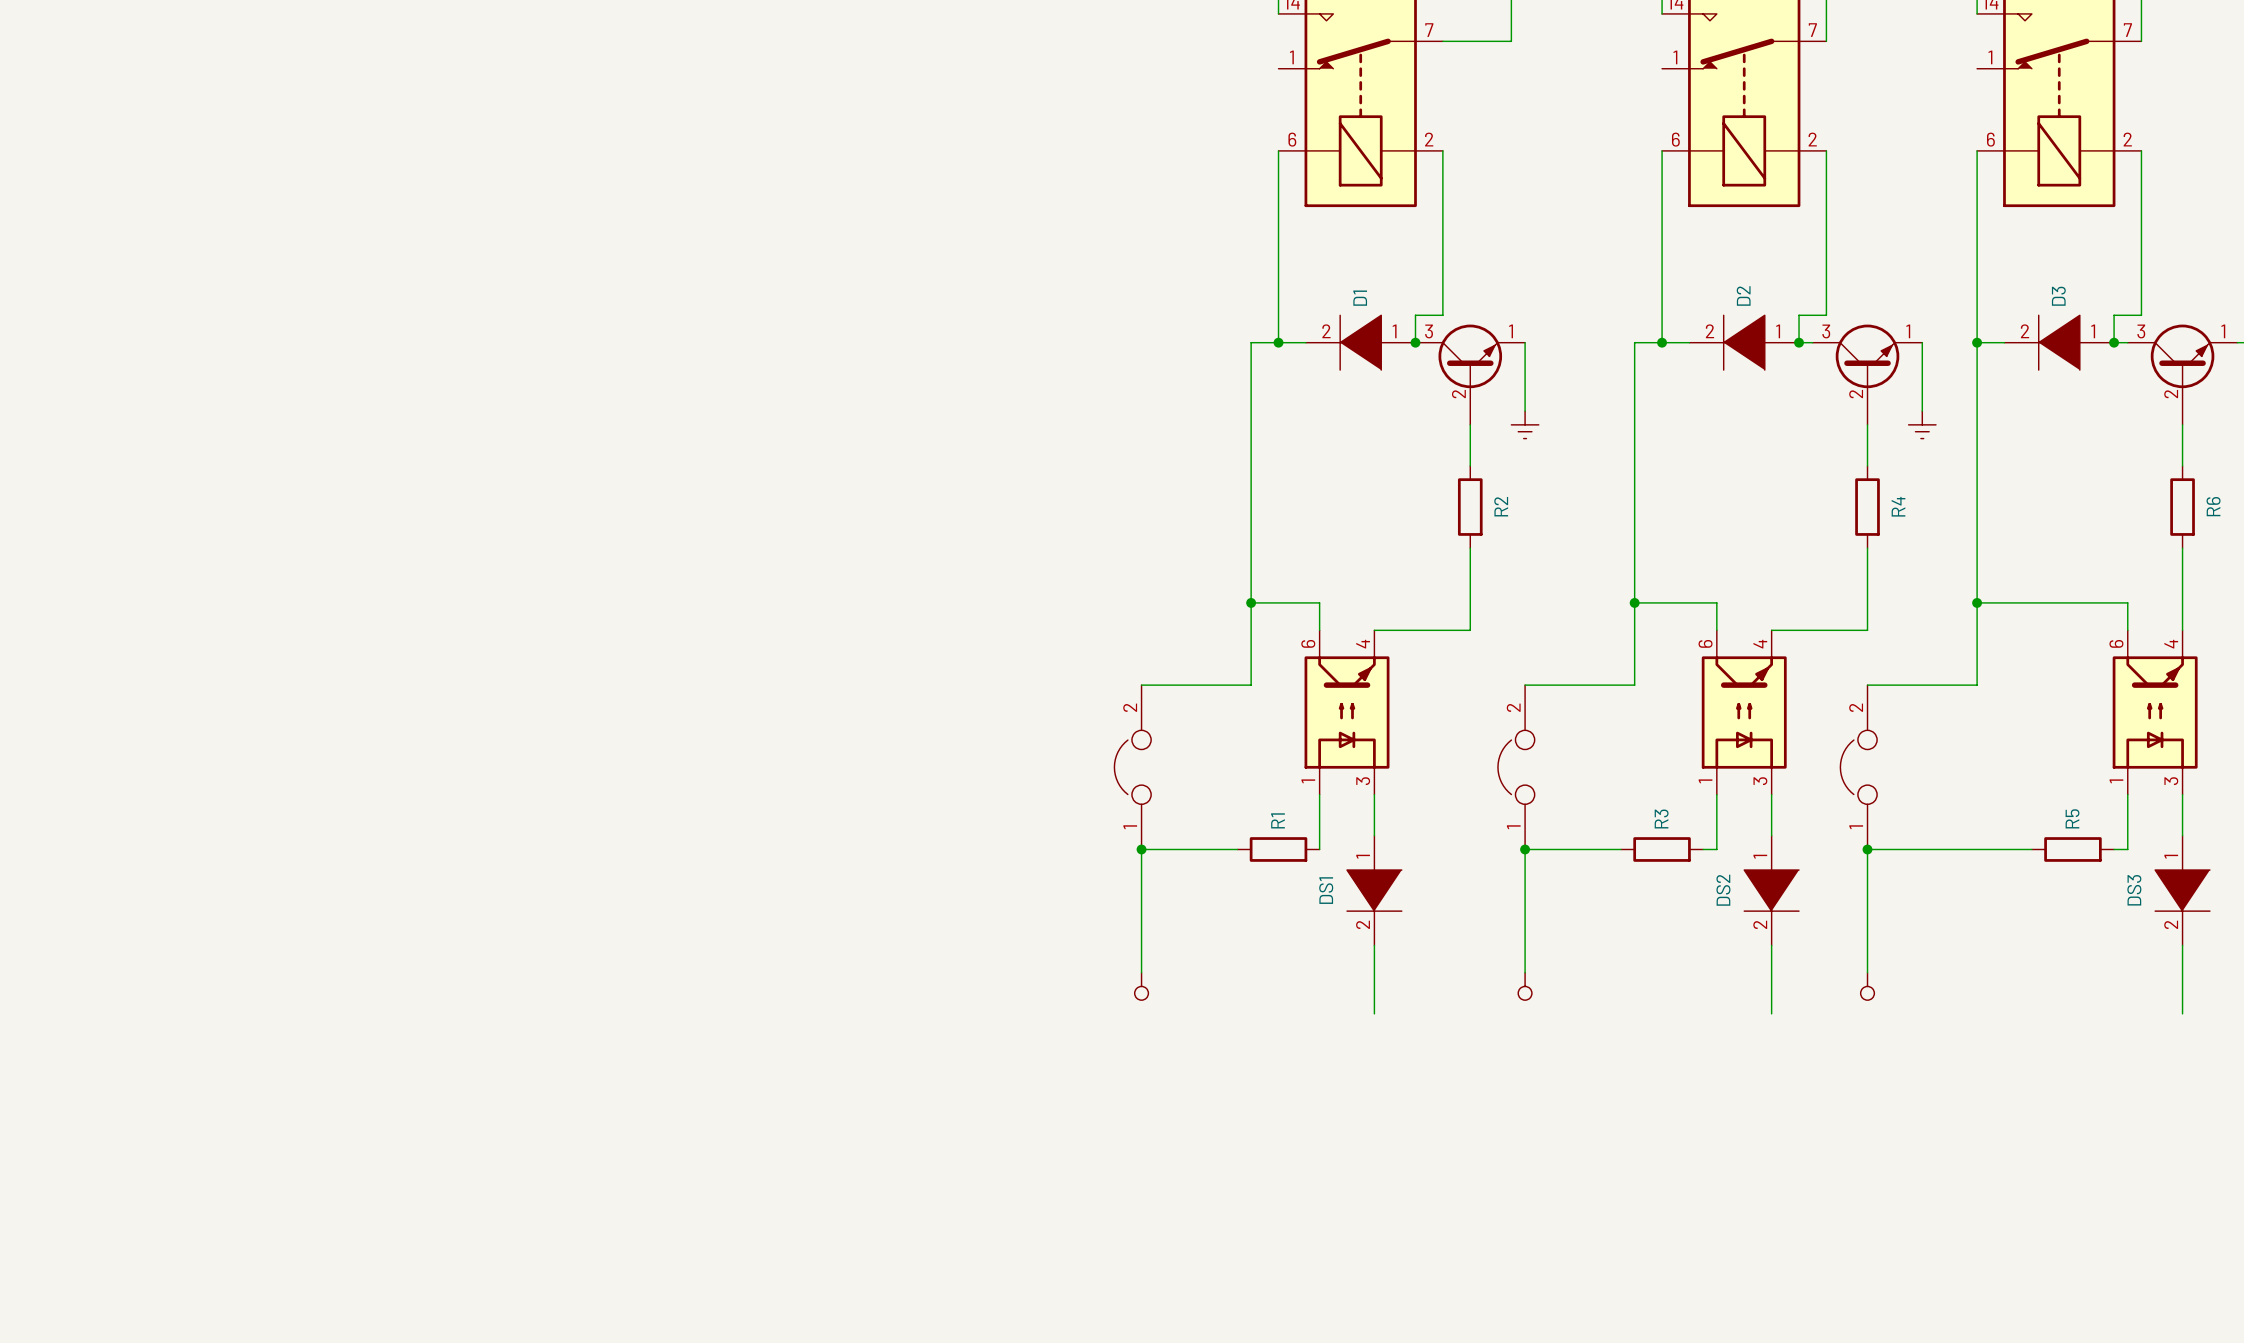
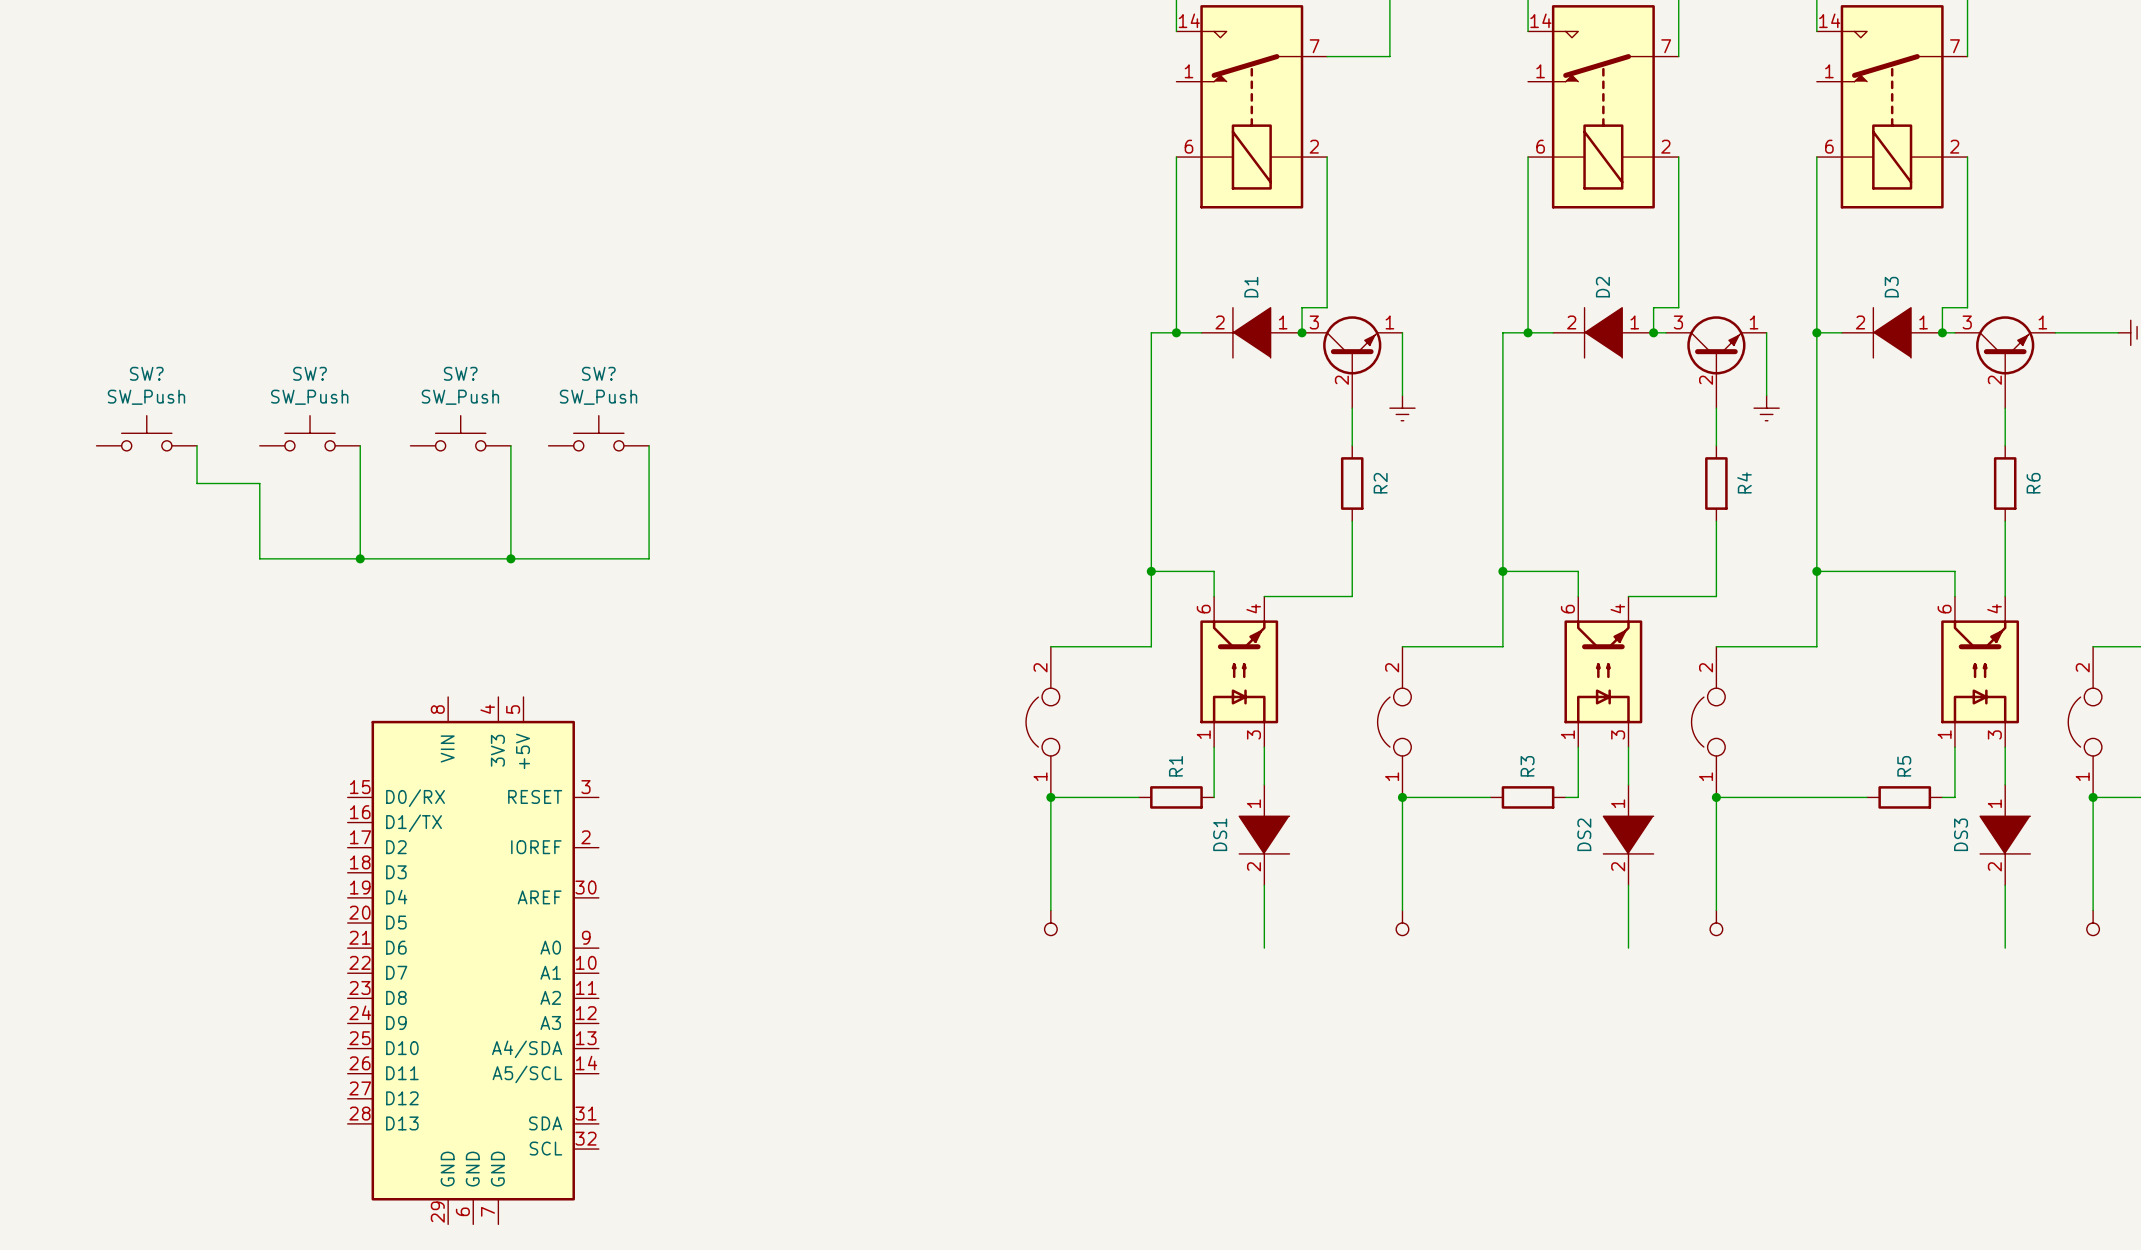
SW?: none -> SW_Push (146, 433)
SW?: none -> SW_Push (310, 433)
SW?: none -> SW_Push (460, 433)
SW?: none -> SW_Push (598, 433)
wire: none -> (197, 445) (197, 483) (259, 483) (259, 558) (649, 558) (649, 445)
wire: none -> (360, 445) (360, 558)
wire: none -> (510, 445) (510, 558)
junction: none -> (360, 558)
junction: none -> (510, 558)
part: none -> (473, 960)

